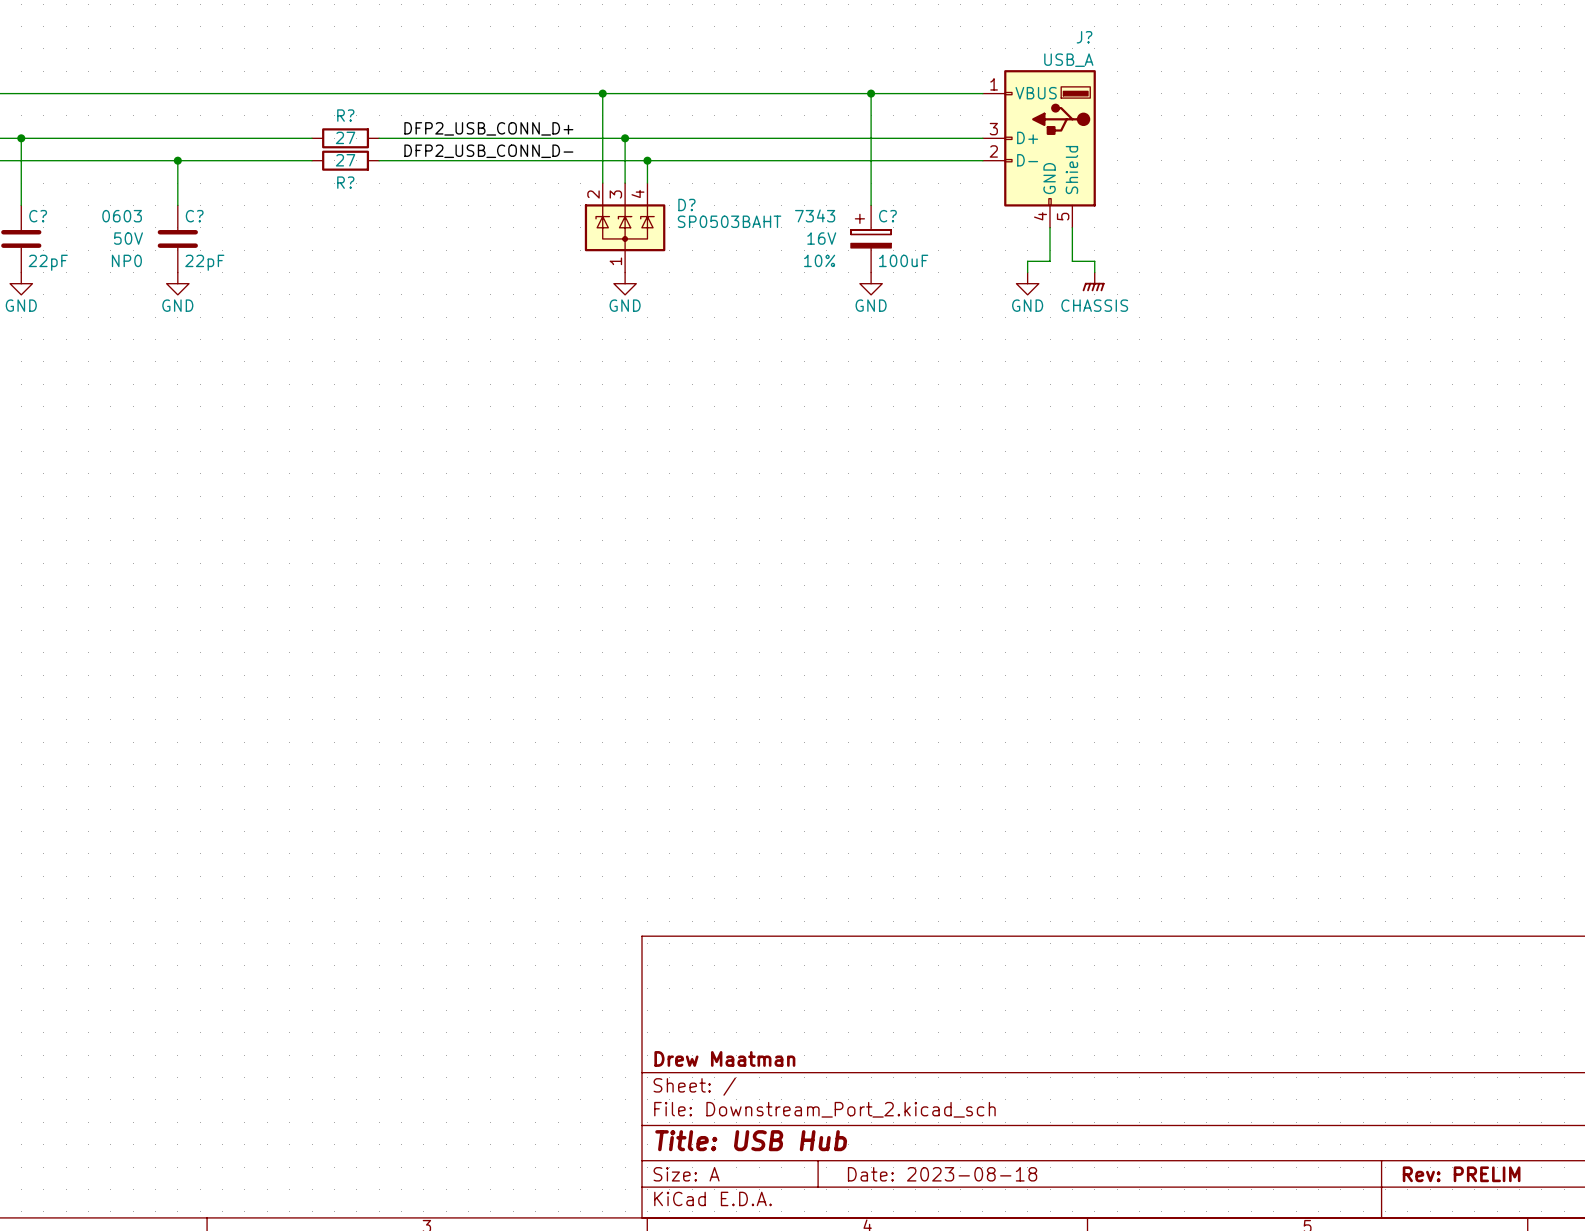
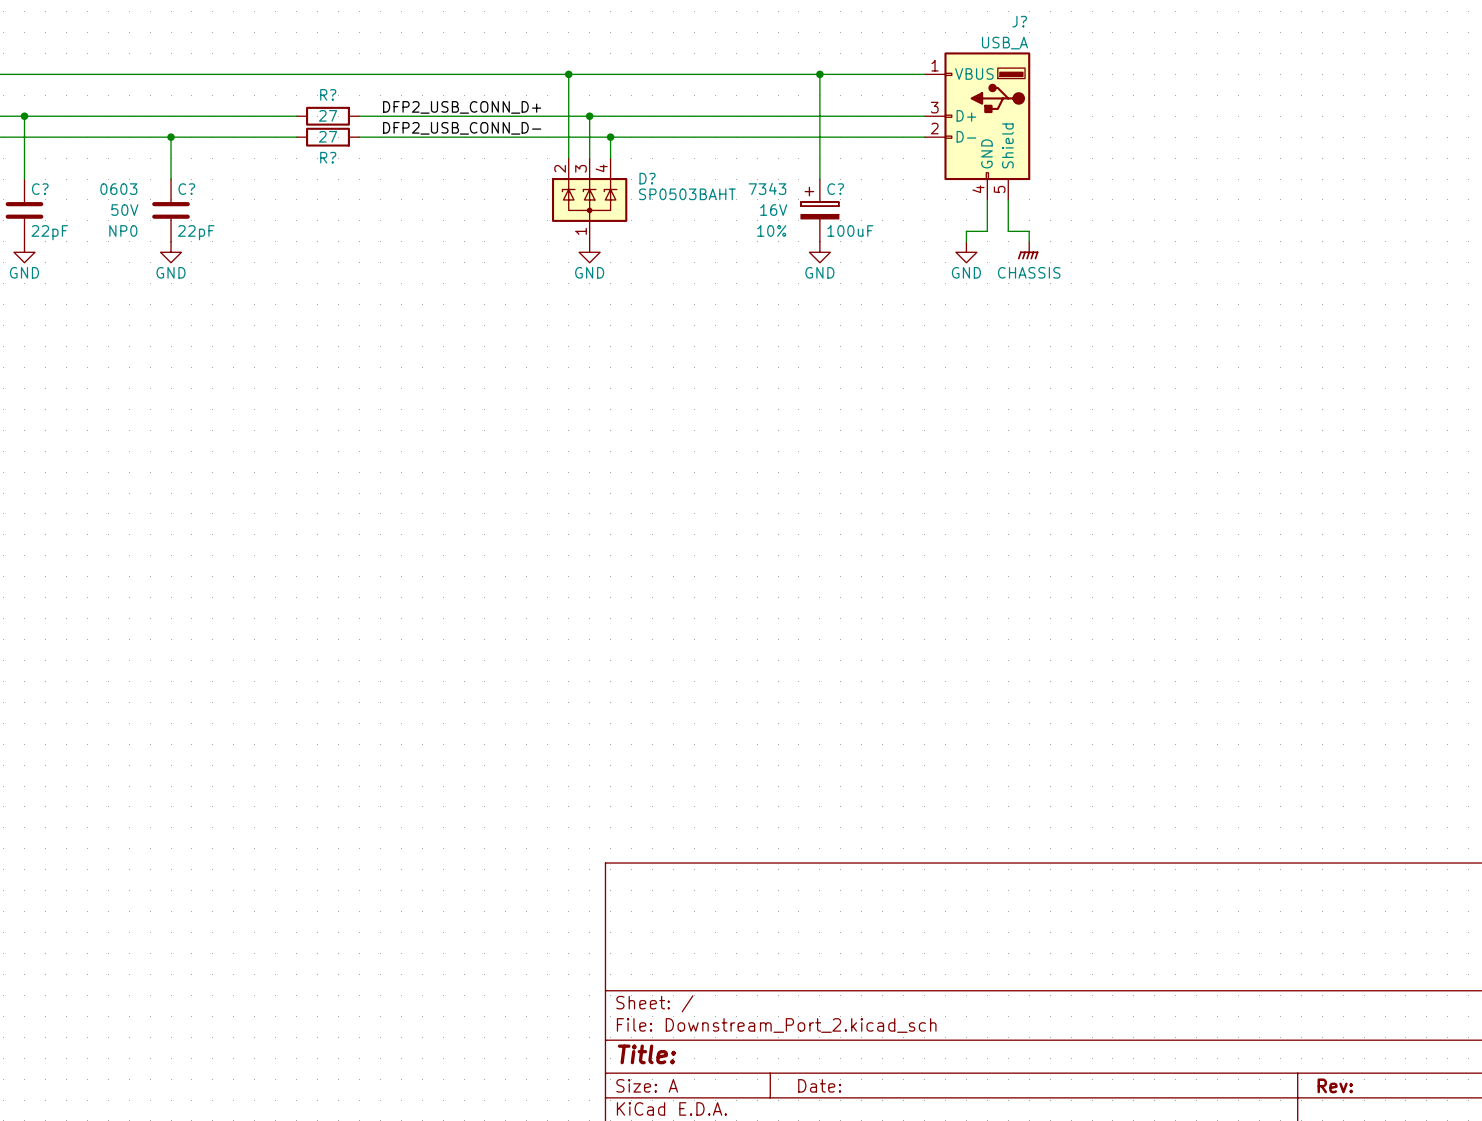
title block: Drew Maatman (724, 1058) -> none
title block: Title: USB Hub (751, 1140) -> Title: (646, 1054)
title block: Date: 2023-08-18 (942, 1174) -> Date: (819, 1085)
title block: Rev: PRELIM (1461, 1174) -> Rev: (1335, 1085)

